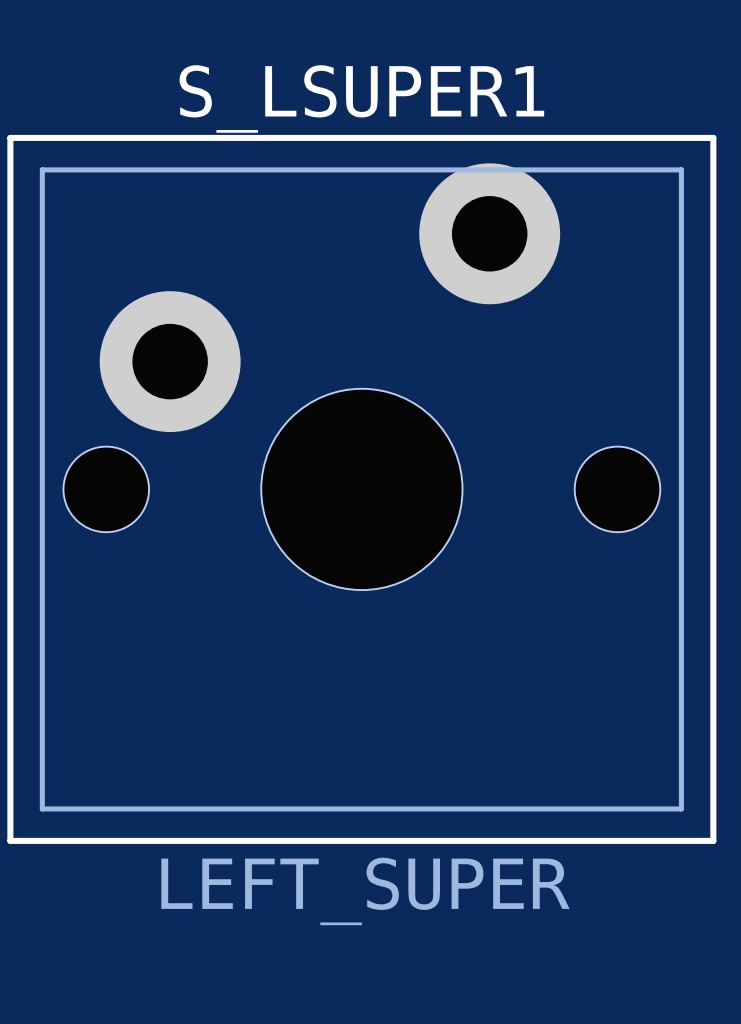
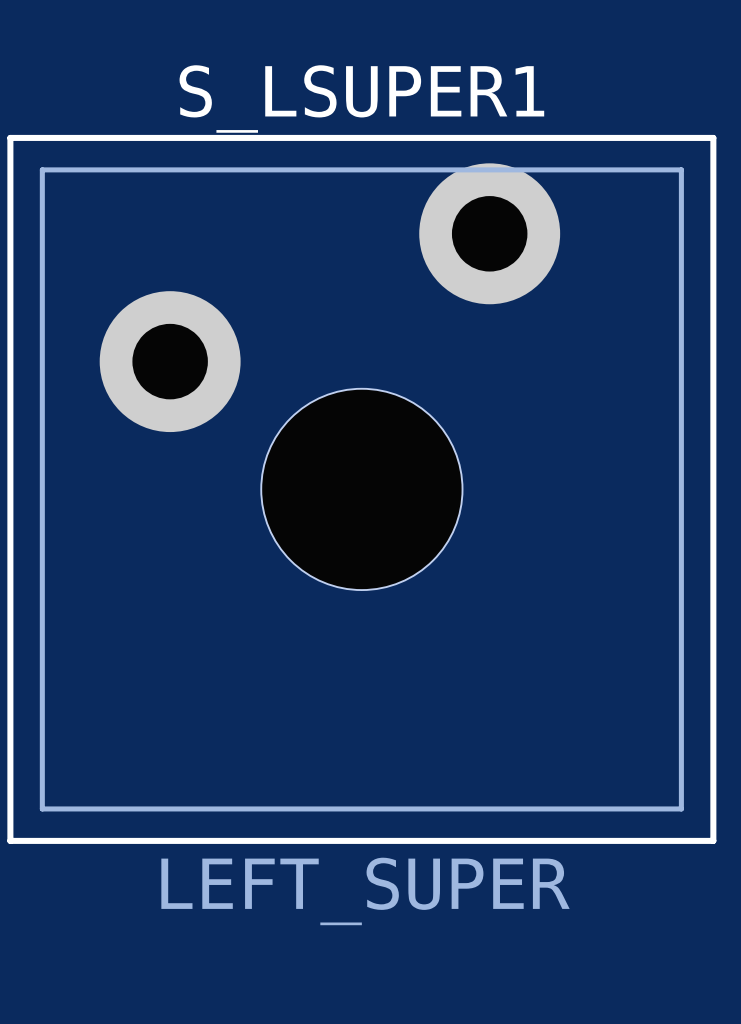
S_LSUPER1 footprint: [7, 134, 717, 844] -> [7, 134, 717, 844]

